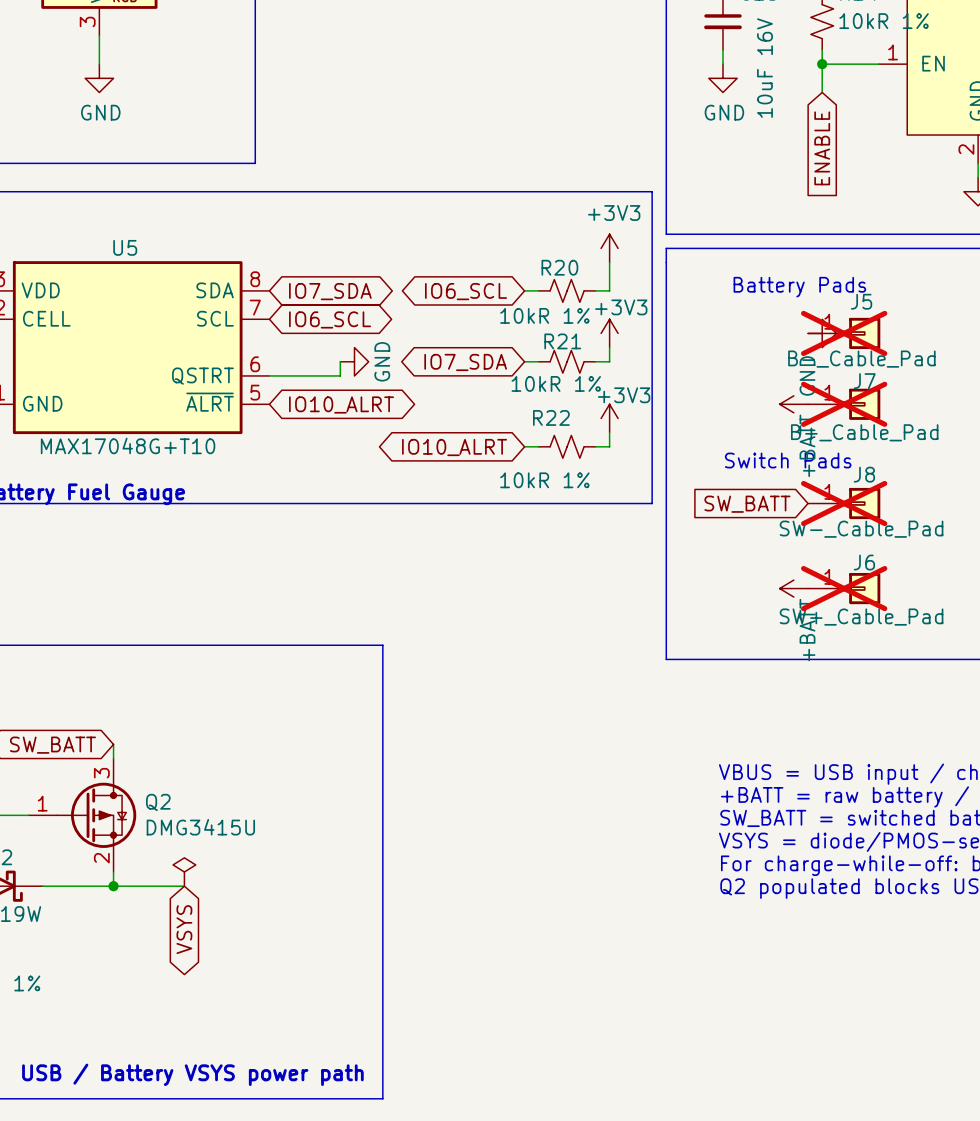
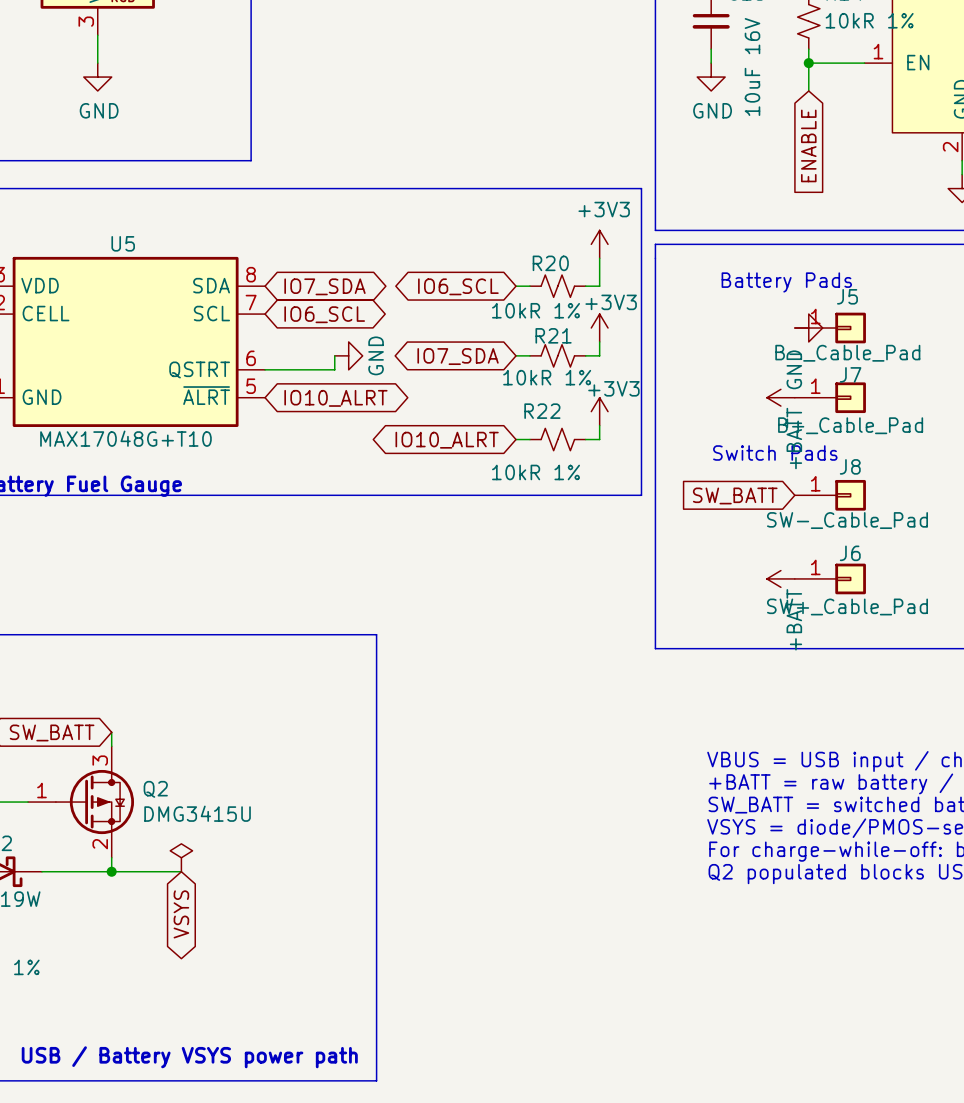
J5 do-not-place cross: (844, 333) -> none
J7 do-not-place cross: (844, 404) -> none
J8 do-not-place cross: (844, 503) -> none
J6 do-not-place cross: (844, 588) -> none

